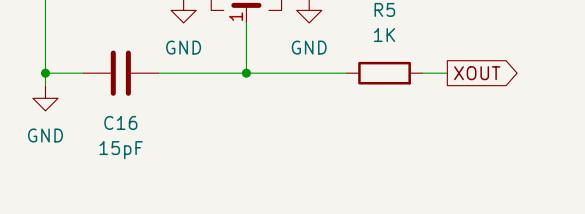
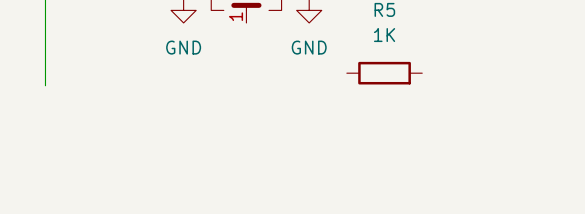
wire: (246, 22) (246, 73) -> none
wire: (45, 73) (83, 73) -> none
junction: (45, 73) -> none
C16: 15pF (120, 73) -> none
wire: (158, 73) (346, 73) -> none
junction: (246, 73) -> none
wire: (422, 73) (447, 73) -> none
global label: XOUT (477, 73) -> none
power symbol: GND (45, 98) -> none

